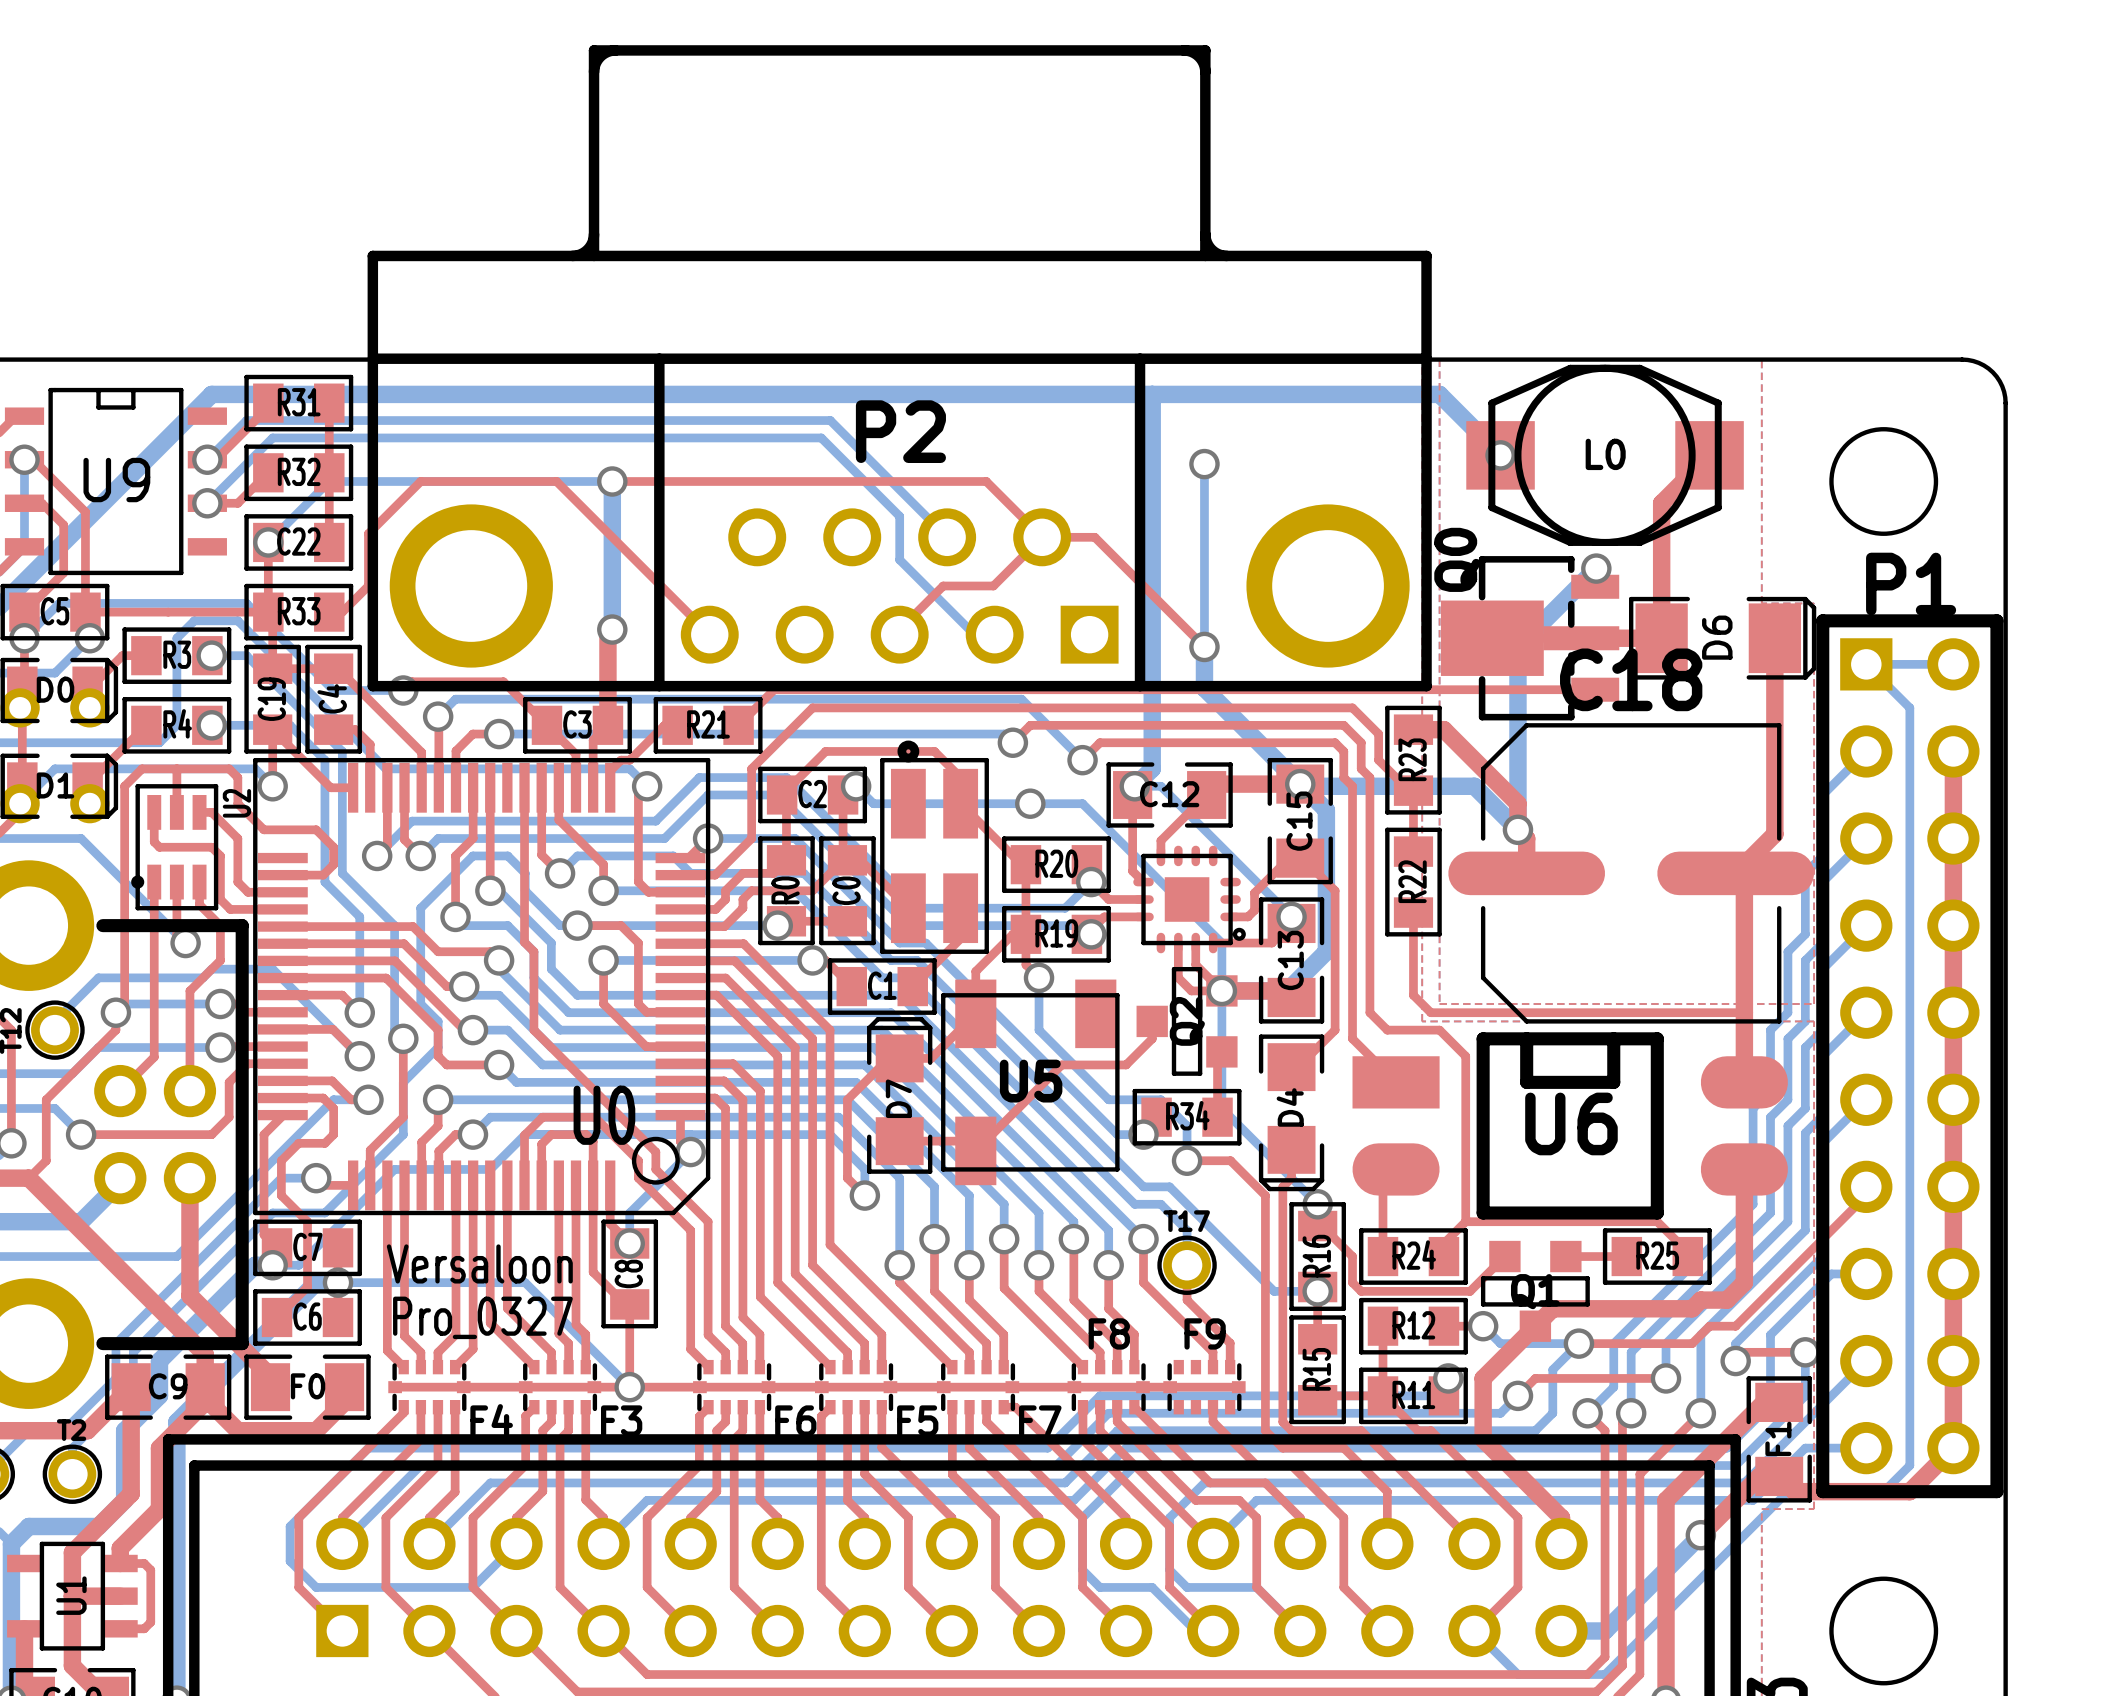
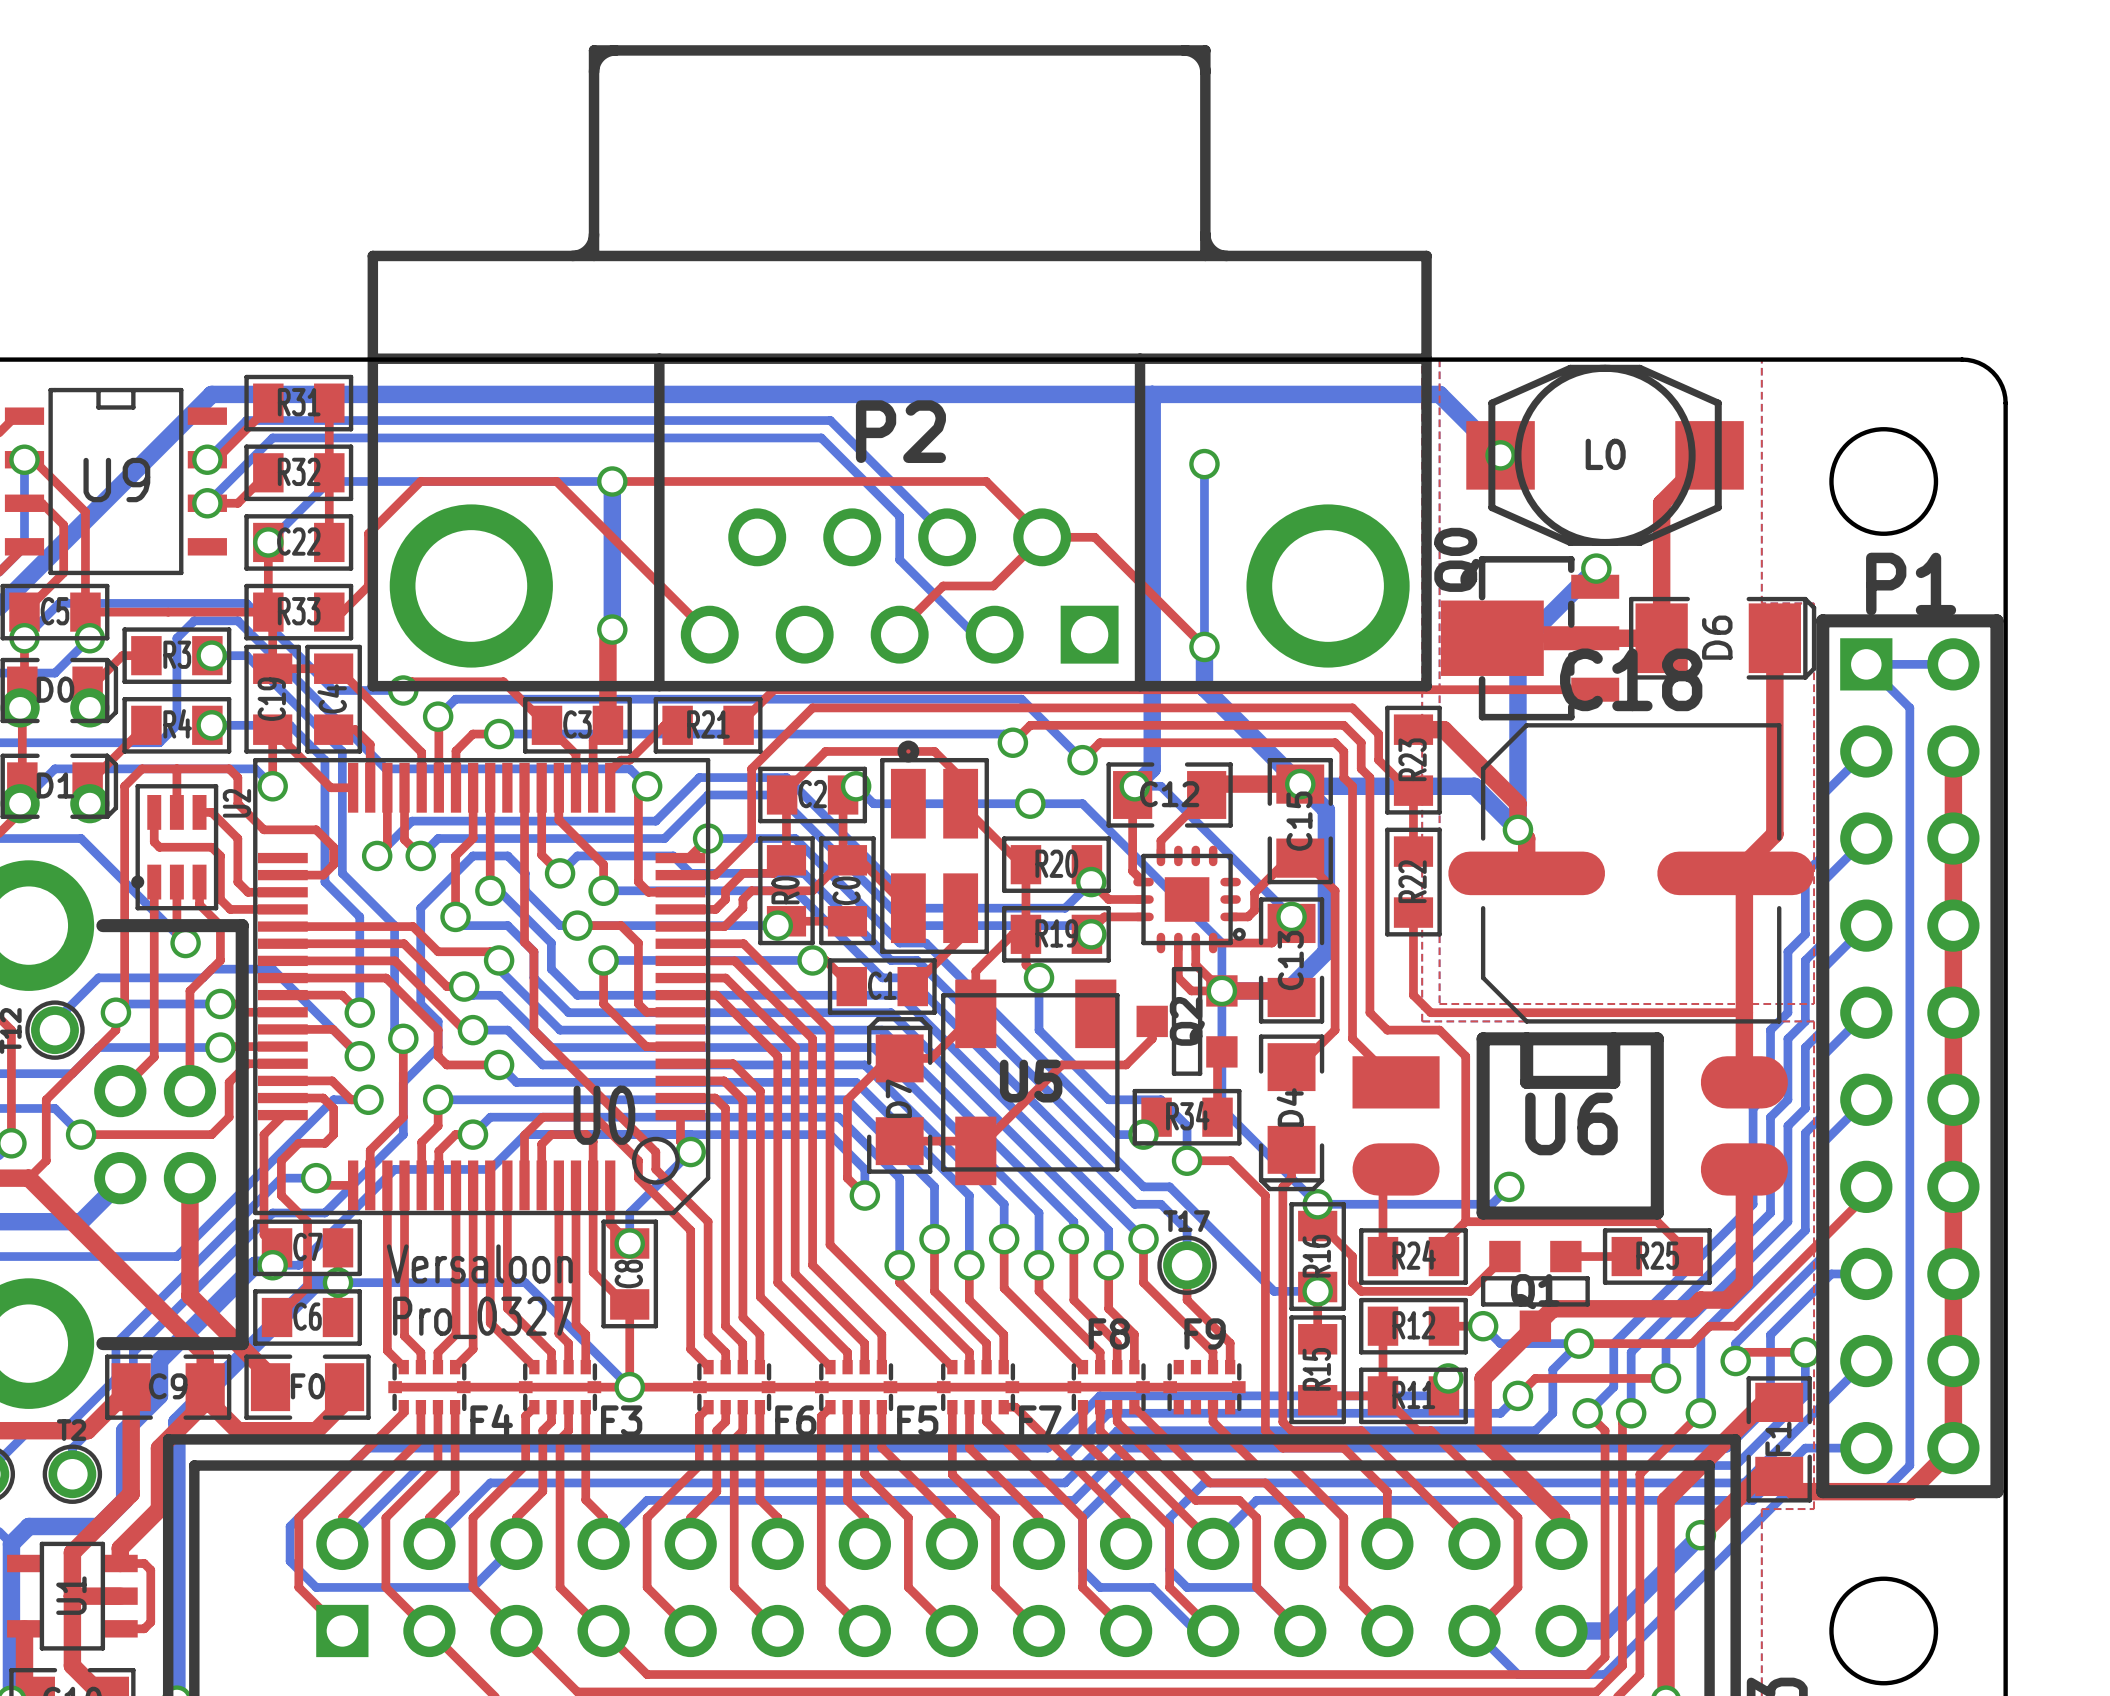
bottom track: none -> (1509, 1186) (1491, 1204) (1317, 1204)
via: none -> (1509, 1186)

